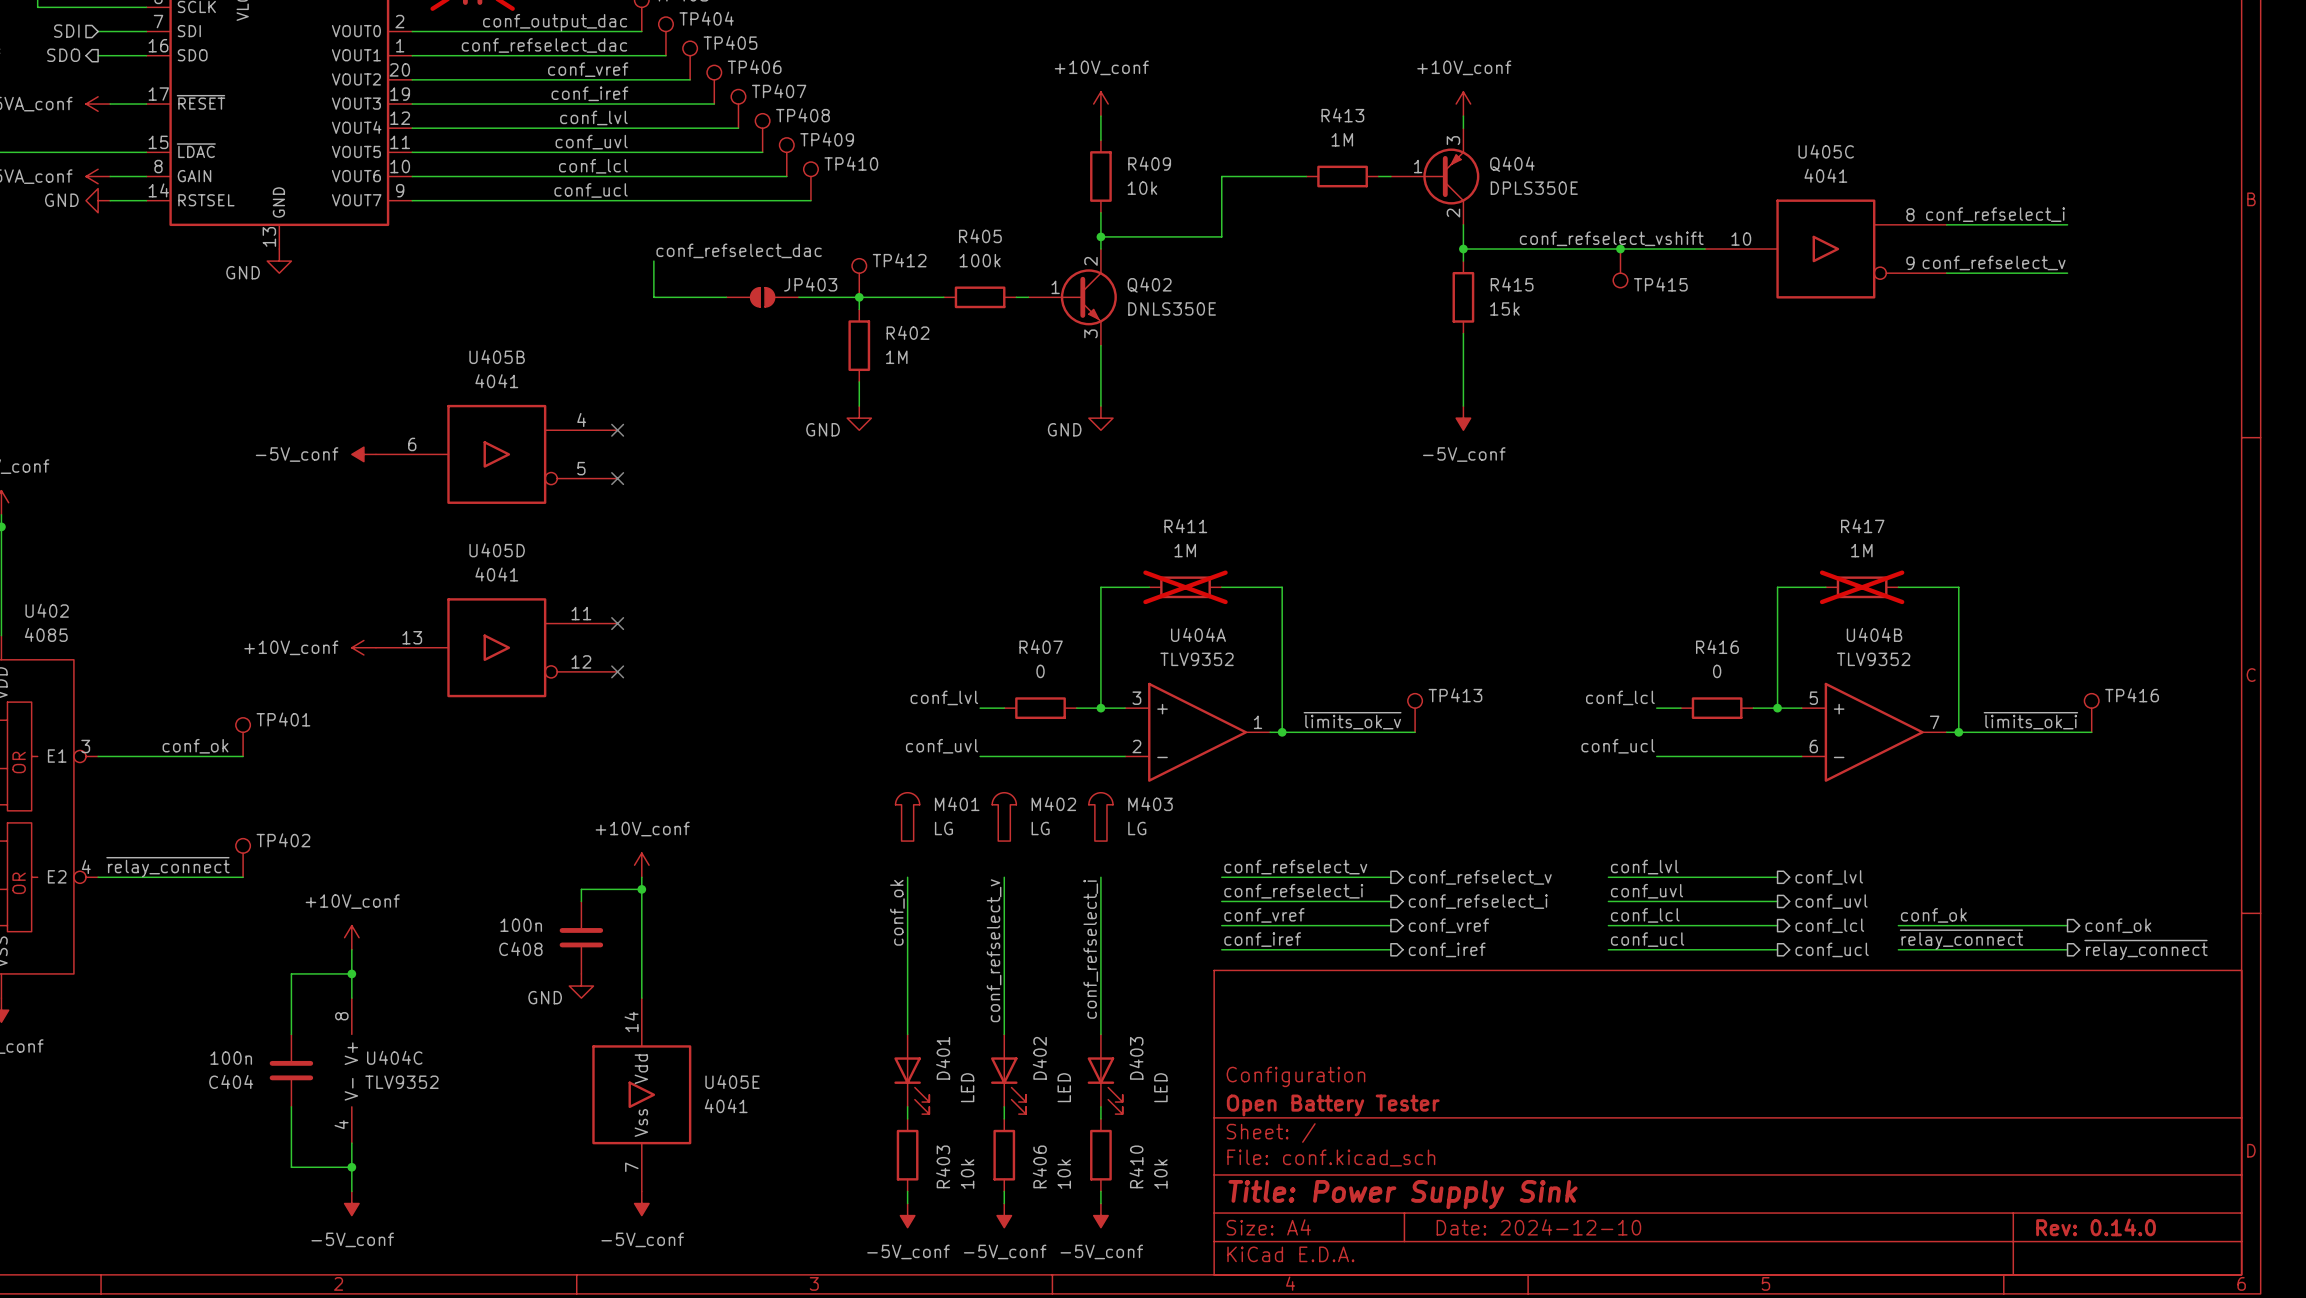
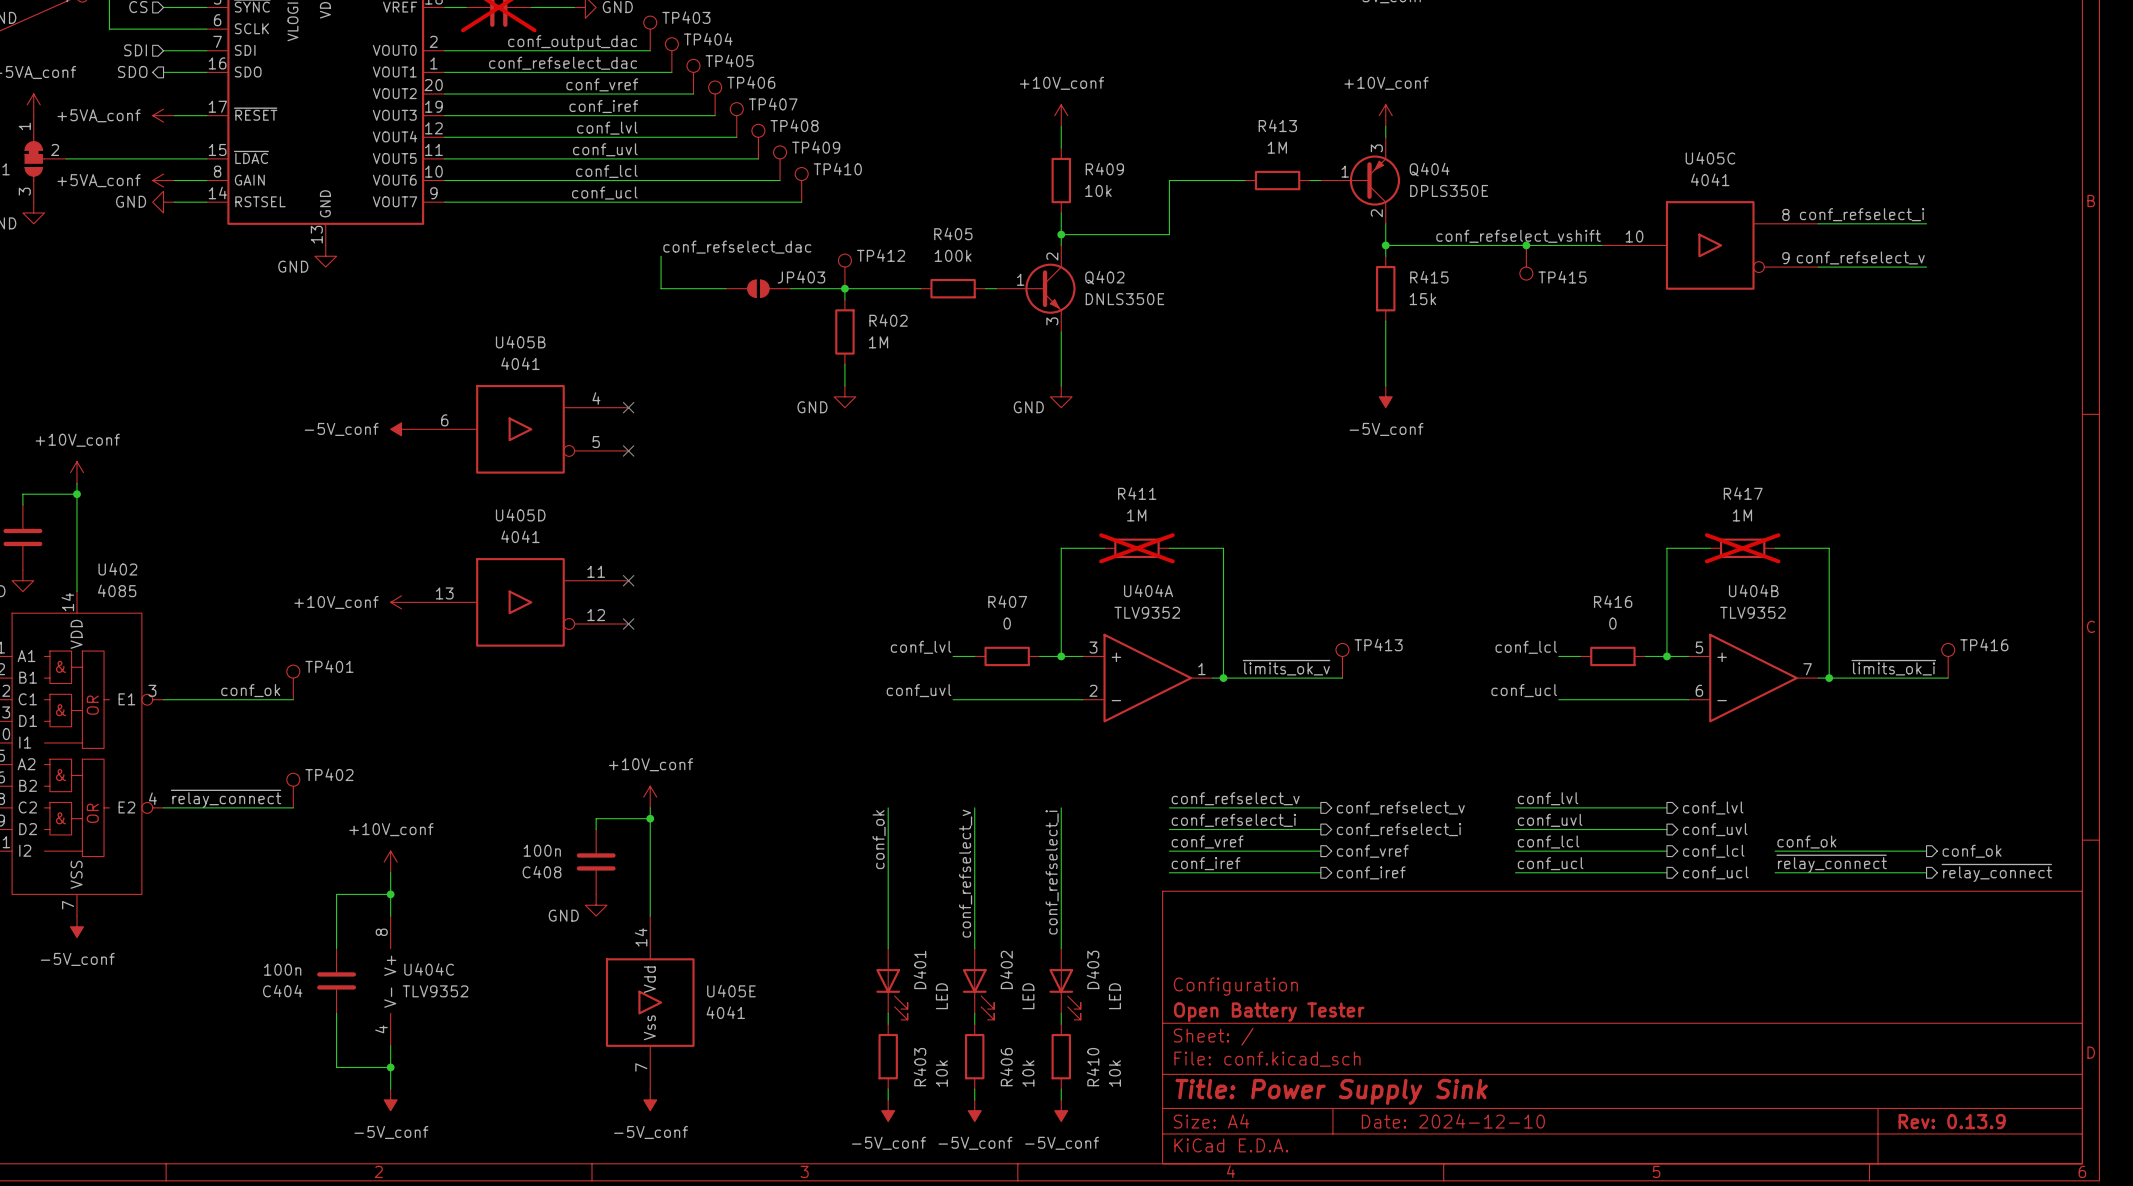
M401: LG (907, 816) -> none
M402: LG (1004, 816) -> none
M403: LG (1100, 816) -> none
title block: Rev: 0.14.0 (2096, 1227) -> Rev: 0.13.9 (1952, 1121)

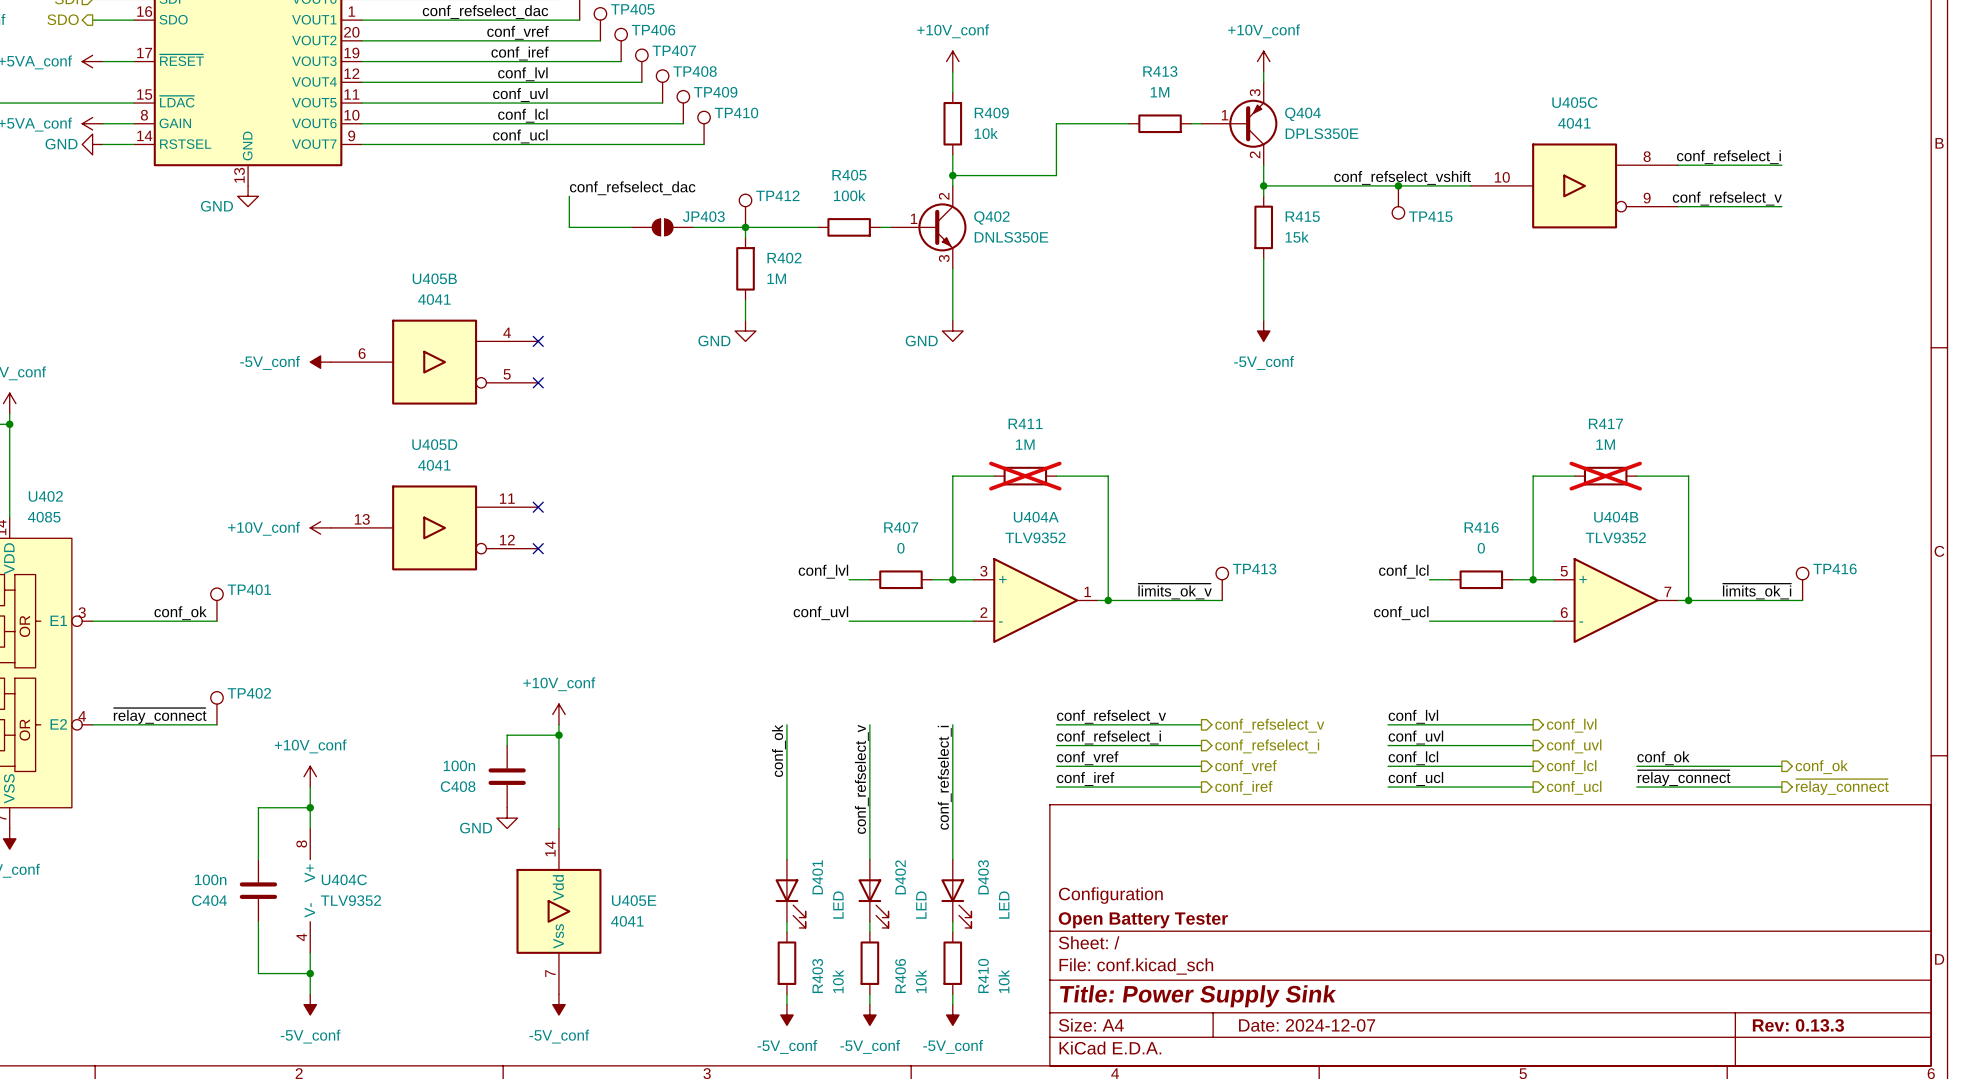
title block: Date: 2024-12-10 (1453, 1121) -> Date: 2024-12-07 (1307, 1025)
title block: Rev: 0.13.9 (1952, 1121) -> Rev: 0.13.3 (1798, 1025)

